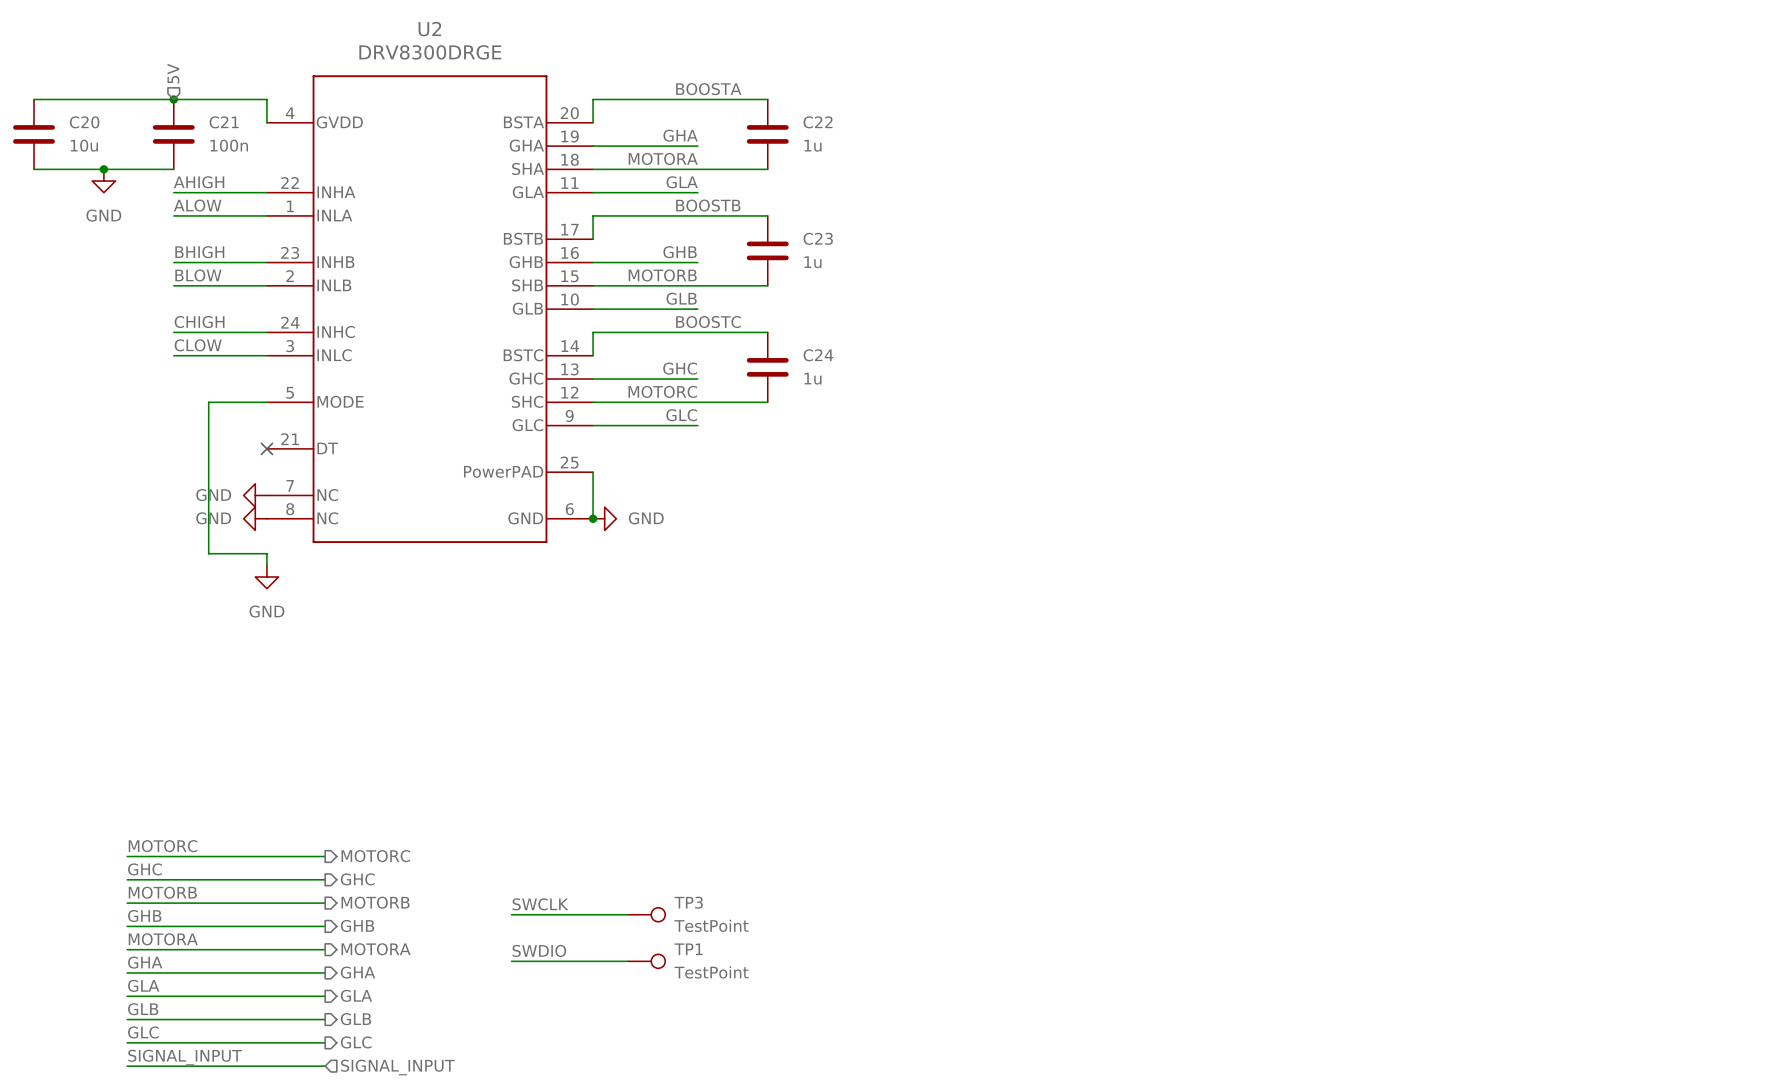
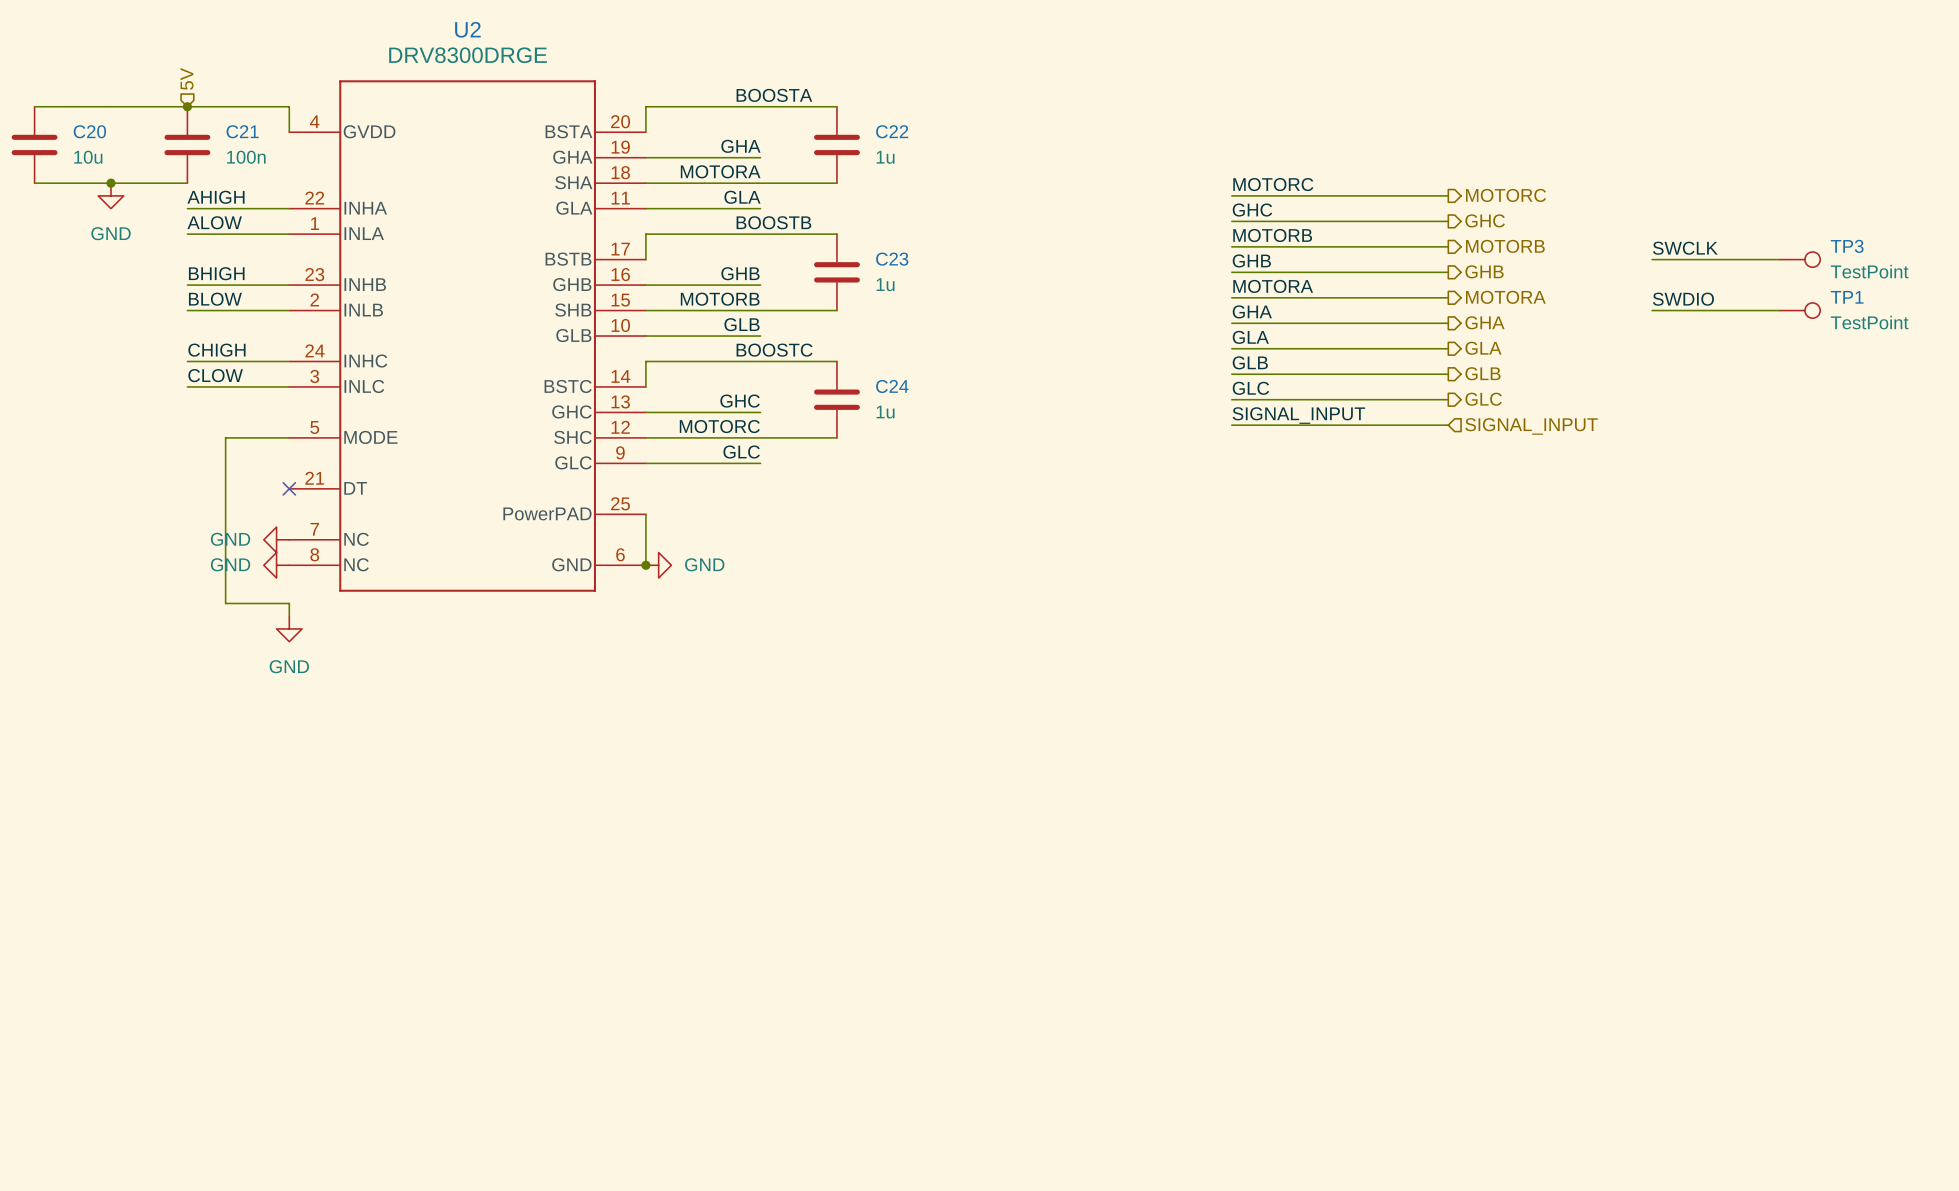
label: none -> MOTORC (1273, 184)
hierarchical label: none -> MOTORC (1506, 195)
wire: none -> (1231, 195) (1448, 195)
label: none -> GHC (1252, 210)
hierarchical label: none -> GHC (1485, 220)
wire: none -> (1231, 221) (1448, 221)
label: none -> MOTORB (1272, 235)
wire: none -> (1231, 246) (1448, 246)
hierarchical label: none -> MOTORB (1505, 246)
label: none -> SWCLK (1685, 248)
wire: none -> (1652, 259) (1779, 259)
label: none -> GHB (1251, 260)
wire: none -> (1231, 272) (1448, 272)
hierarchical label: none -> GHB (1484, 271)
label: none -> MOTORA (1273, 286)
hierarchical label: none -> MOTORA (1505, 297)
wire: none -> (1231, 297) (1448, 297)
label: none -> SWDIO (1683, 299)
wire: none -> (1652, 310) (1779, 310)
label: none -> GHA (1252, 311)
wire: none -> (1231, 323) (1448, 323)
hierarchical label: none -> GHA (1485, 322)
label: none -> GLA (1250, 337)
wire: none -> (1231, 348) (1448, 348)
hierarchical label: none -> GLA (1483, 348)
label: none -> GLB (1250, 362)
hierarchical label: none -> GLB (1482, 373)
wire: none -> (1231, 374) (1448, 374)
label: none -> GLC (1250, 388)
hierarchical label: none -> GLC (1483, 399)
wire: none -> (1231, 399) (1448, 399)
label: none -> SIGNAL_INPUT (1298, 415)
wire: none -> (1231, 425) (1448, 425)
hierarchical label: none -> SIGNAL_INPUT (1531, 426)
label: MOTORC (163, 846) -> none
wire: (127, 856) (325, 856) -> none
hierarchical label: MOTORC (375, 856) -> none
label: GHC (144, 869) -> none
wire: (127, 879) (325, 879) -> none
hierarchical label: GHC (357, 879) -> none
label: MOTORB (162, 892) -> none
hierarchical label: MOTORB (375, 902) -> none
wire: (127, 903) (325, 903) -> none
label: SWCLK (540, 904) -> none
wire: (511, 914) (627, 914) -> none
TP3 position: (646, 914) -> (1799, 259)
label: GHB (144, 916) -> none
hierarchical label: GHB (357, 925) -> none
wire: (127, 926) (325, 926) -> none
label: MOTORA (163, 939) -> none
wire: (127, 949) (325, 949) -> none
hierarchical label: MOTORA (376, 949) -> none
label: SWDIO (539, 950) -> none
wire: (511, 961) (627, 961) -> none
TP1 position: (646, 961) -> (1799, 310)
label: GHA (145, 962) -> none
wire: (127, 972) (325, 972) -> none
hierarchical label: GHA (358, 972) -> none
label: GLA (143, 985) -> none
hierarchical label: GLA (356, 995) -> none
wire: (127, 996) (325, 996) -> none
label: GLB (143, 1009) -> none
wire: (127, 1019) (325, 1019) -> none
hierarchical label: GLB (355, 1019) -> none
label: GLC (143, 1032) -> none
wire: (127, 1042) (325, 1042) -> none
hierarchical label: GLC (356, 1042) -> none
label: SIGNAL_INPUT (185, 1057) -> none
wire: (127, 1066) (325, 1066) -> none
hierarchical label: SIGNAL_INPUT (397, 1067) -> none

